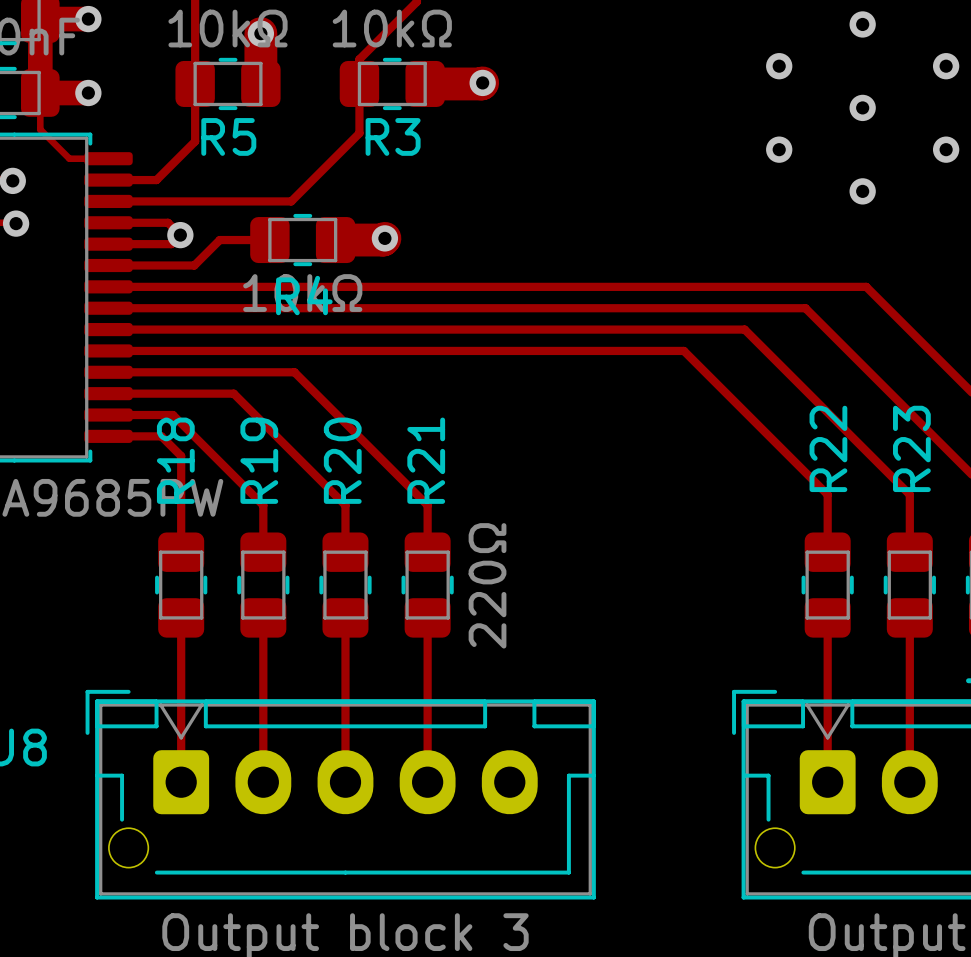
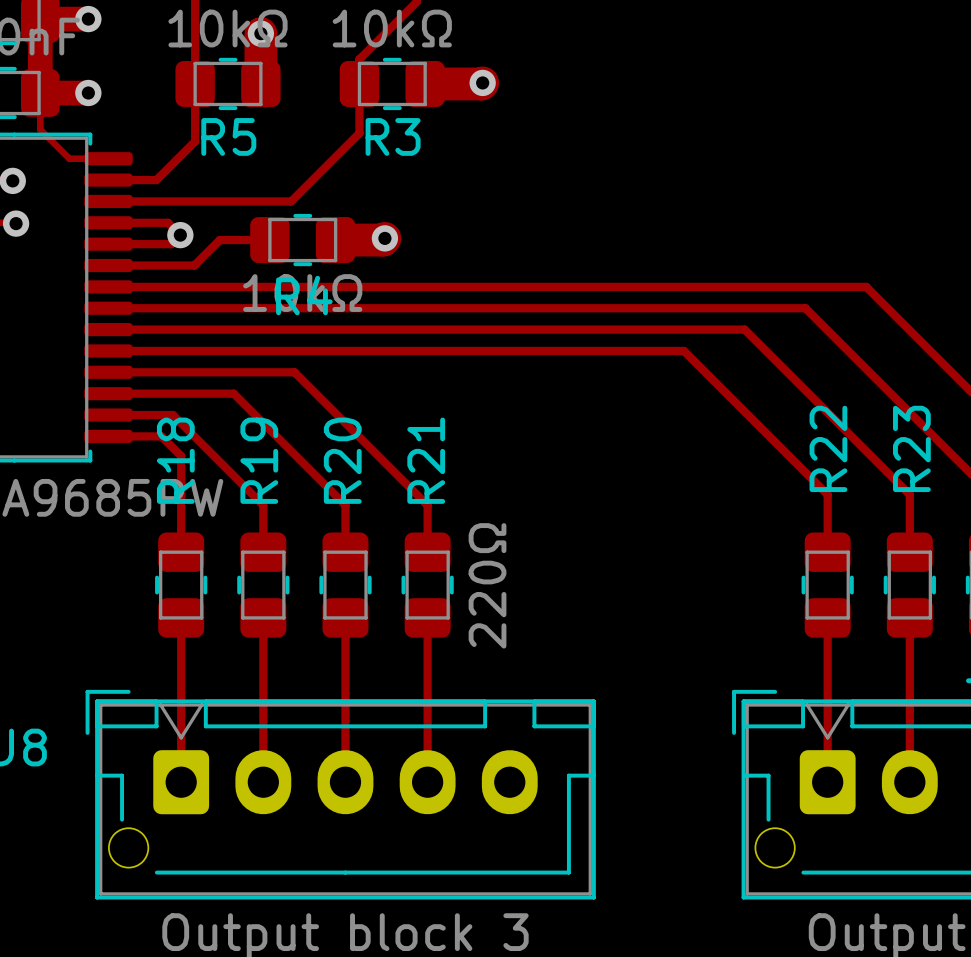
via: (862, 24) -> none
via: (779, 66) -> none
via: (946, 66) -> none
via: (862, 107) -> none
via: (779, 149) -> none
via: (946, 149) -> none
via: (862, 191) -> none

